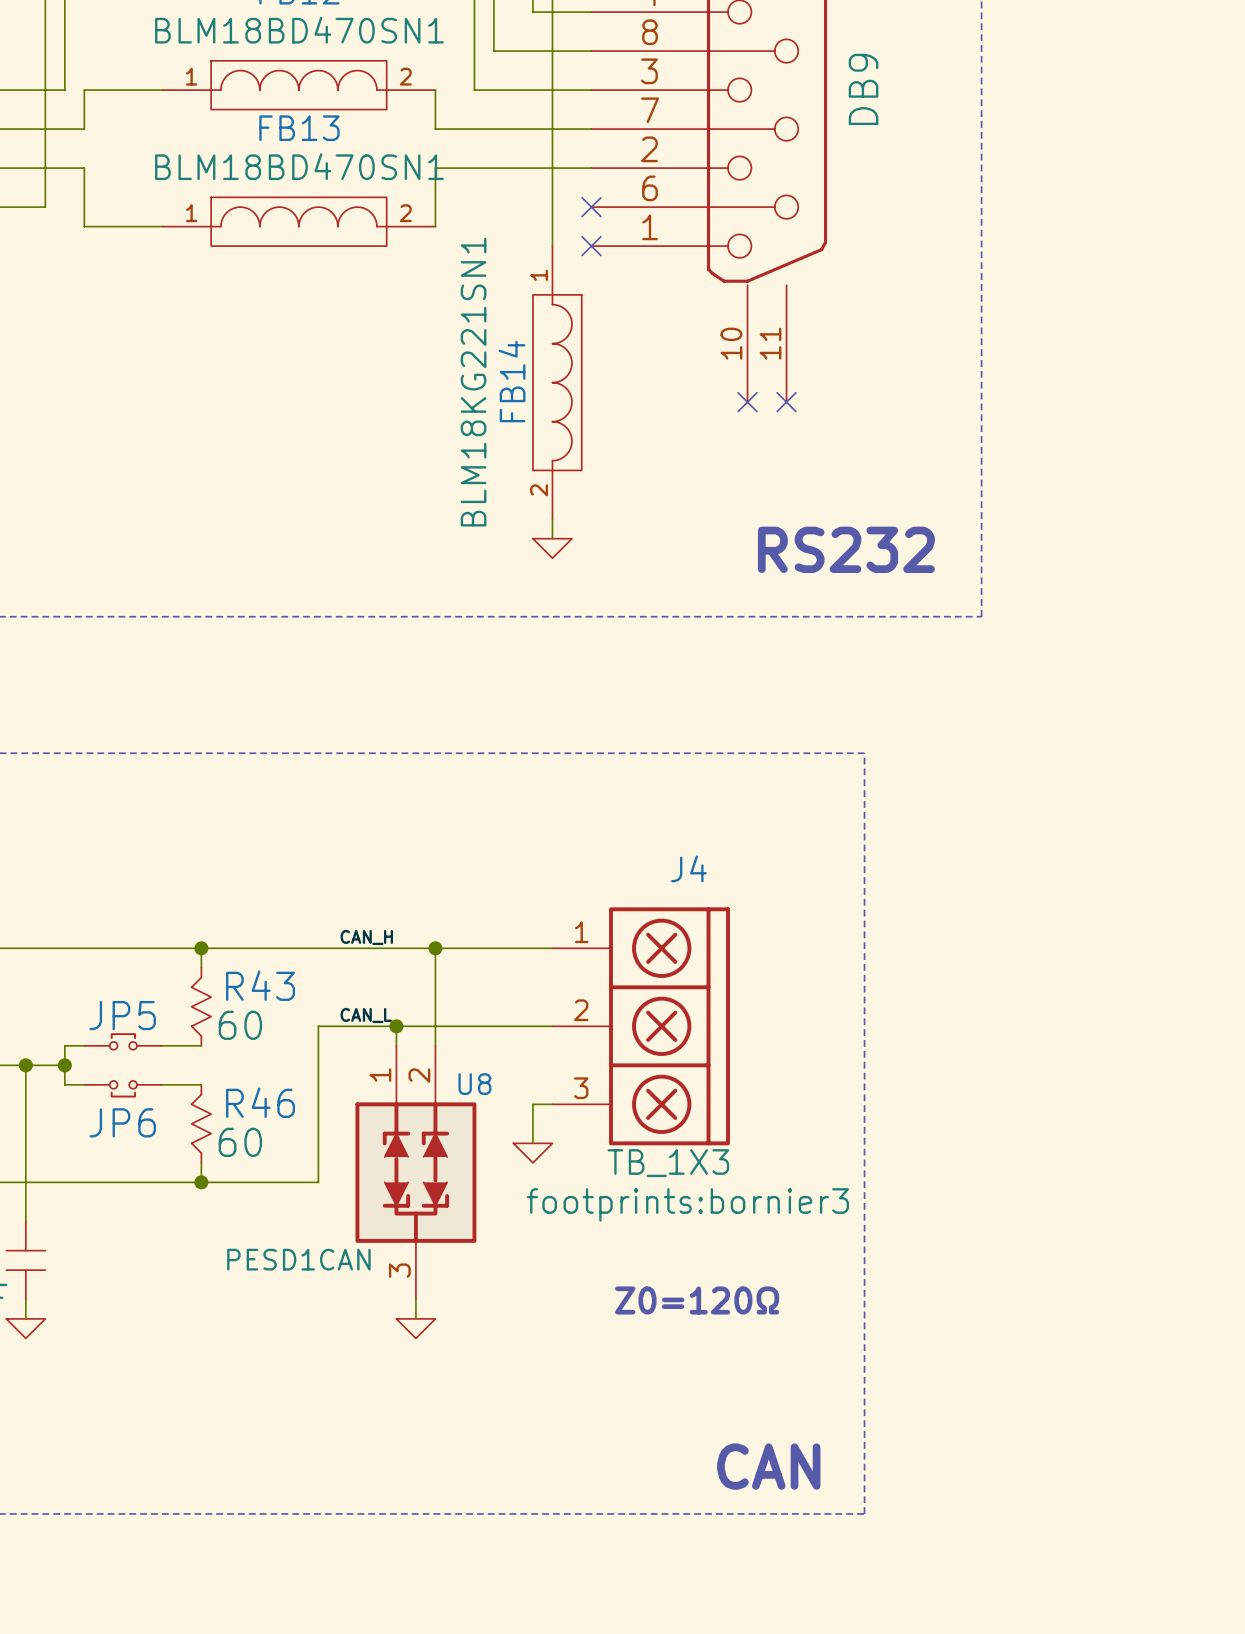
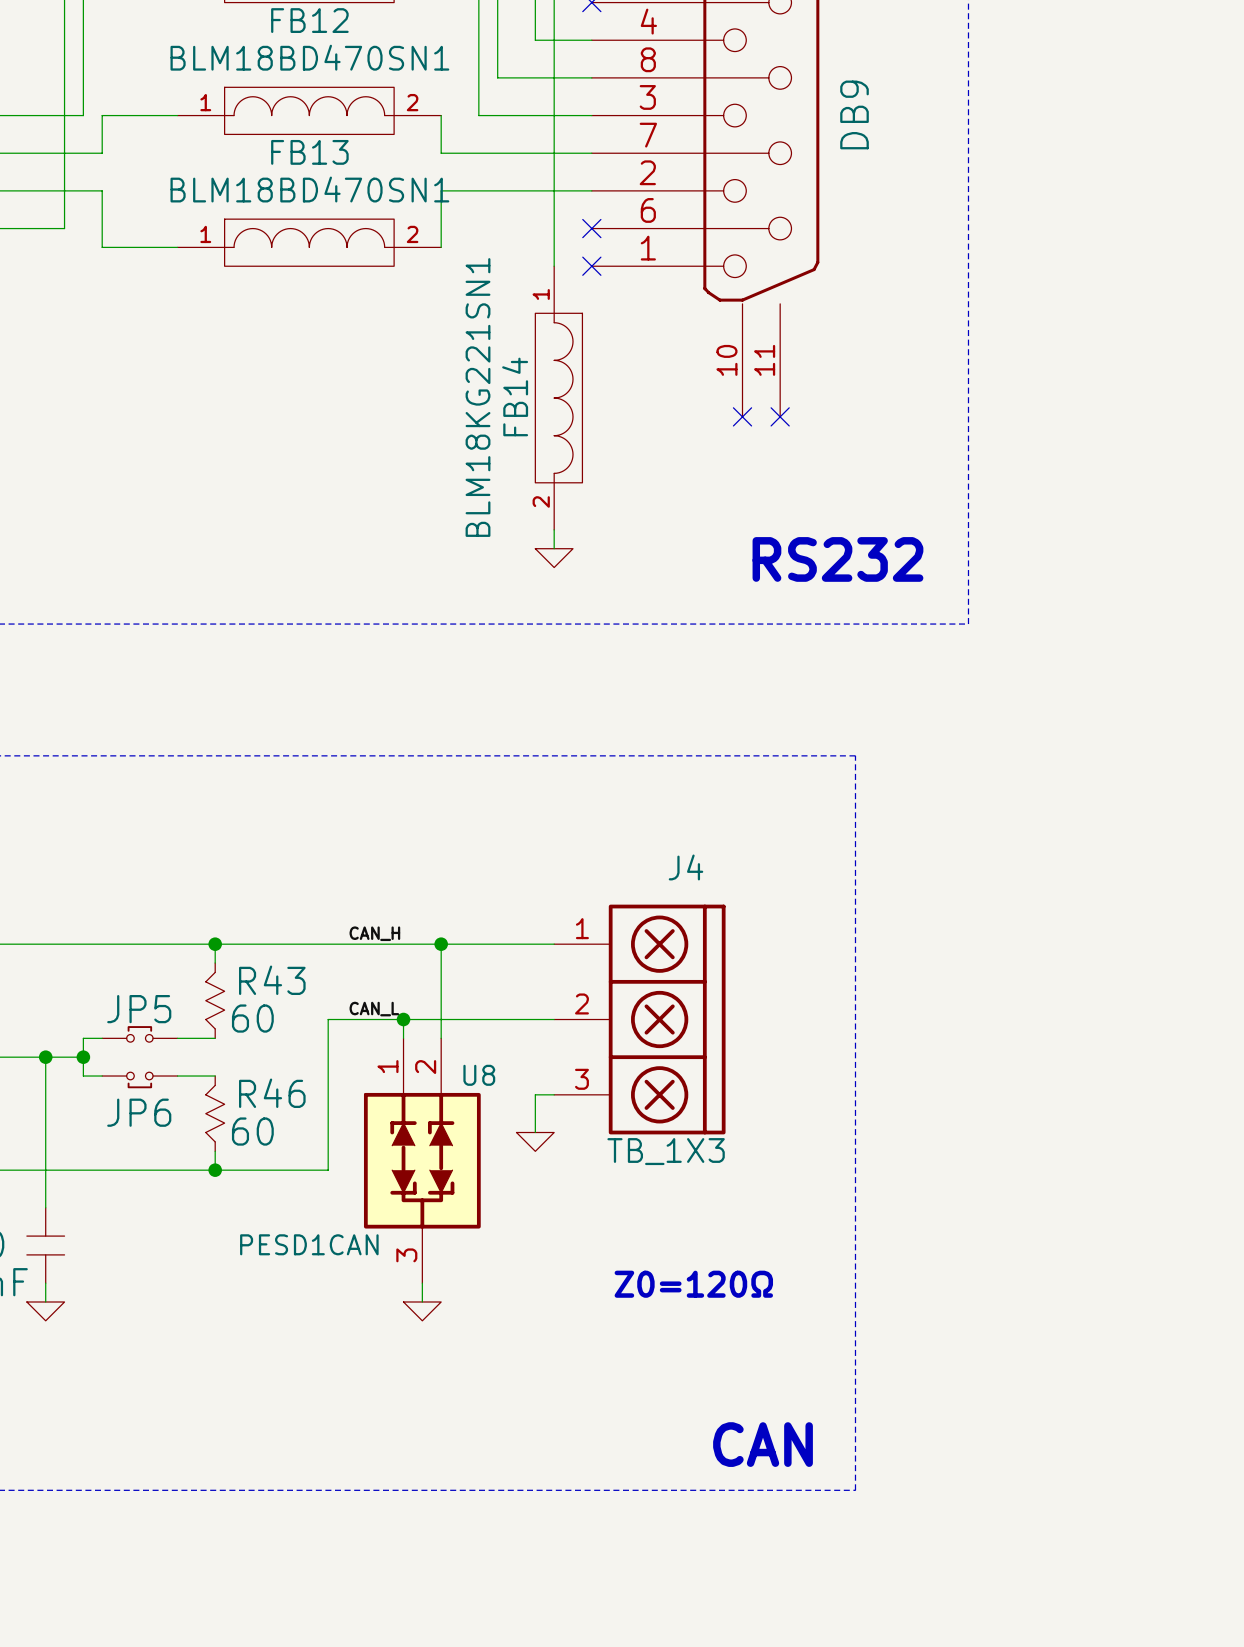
J4 text: footprints:bornier3 (687, 1204) -> none

